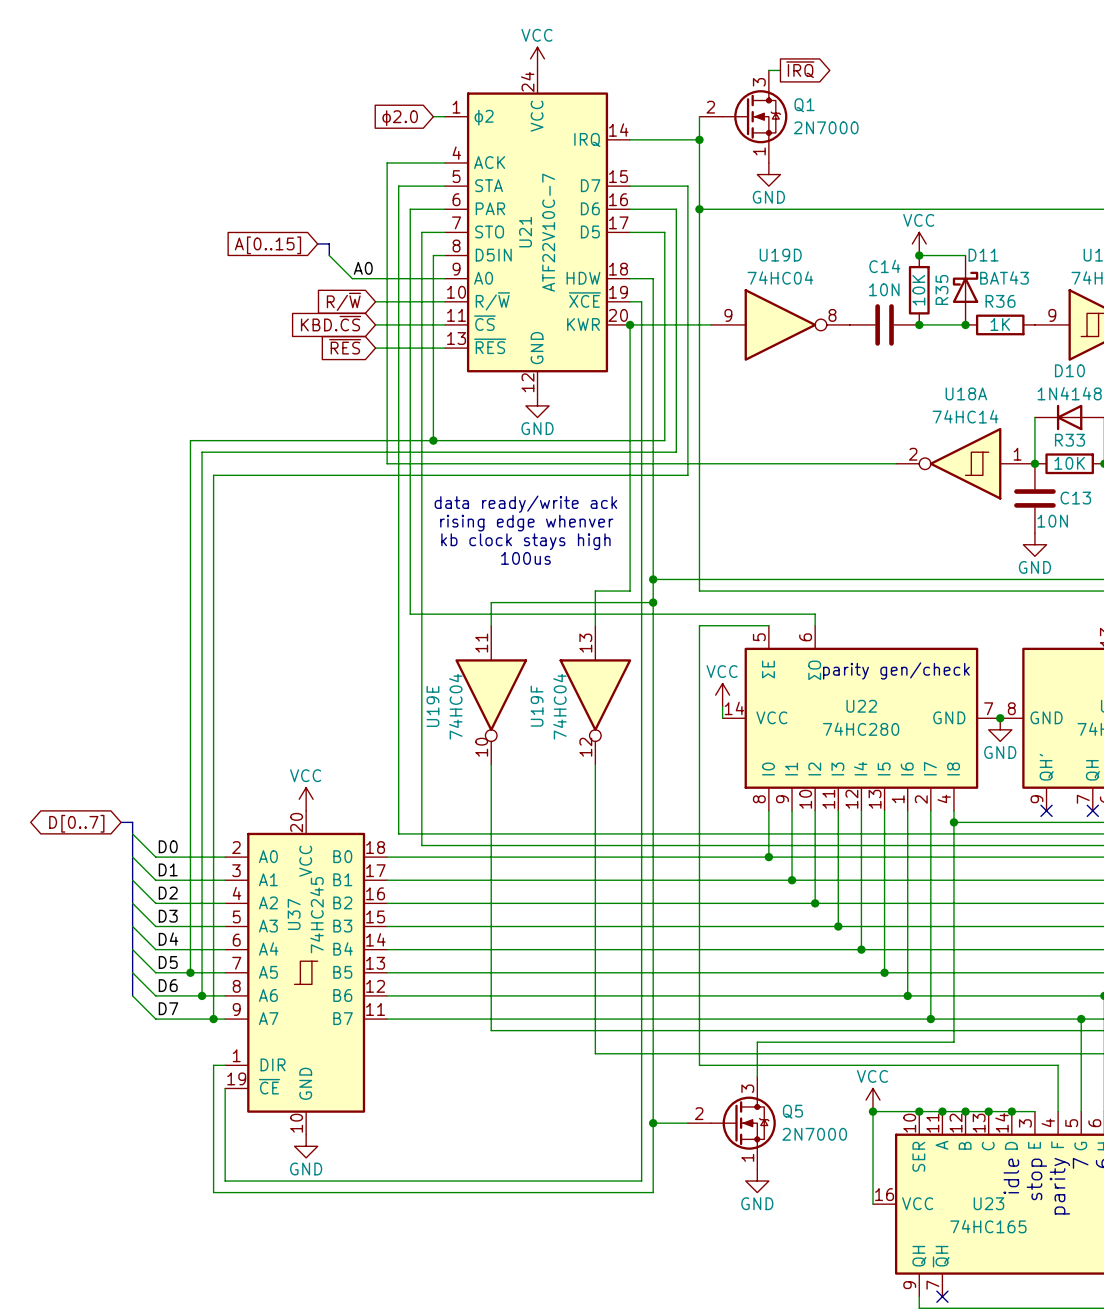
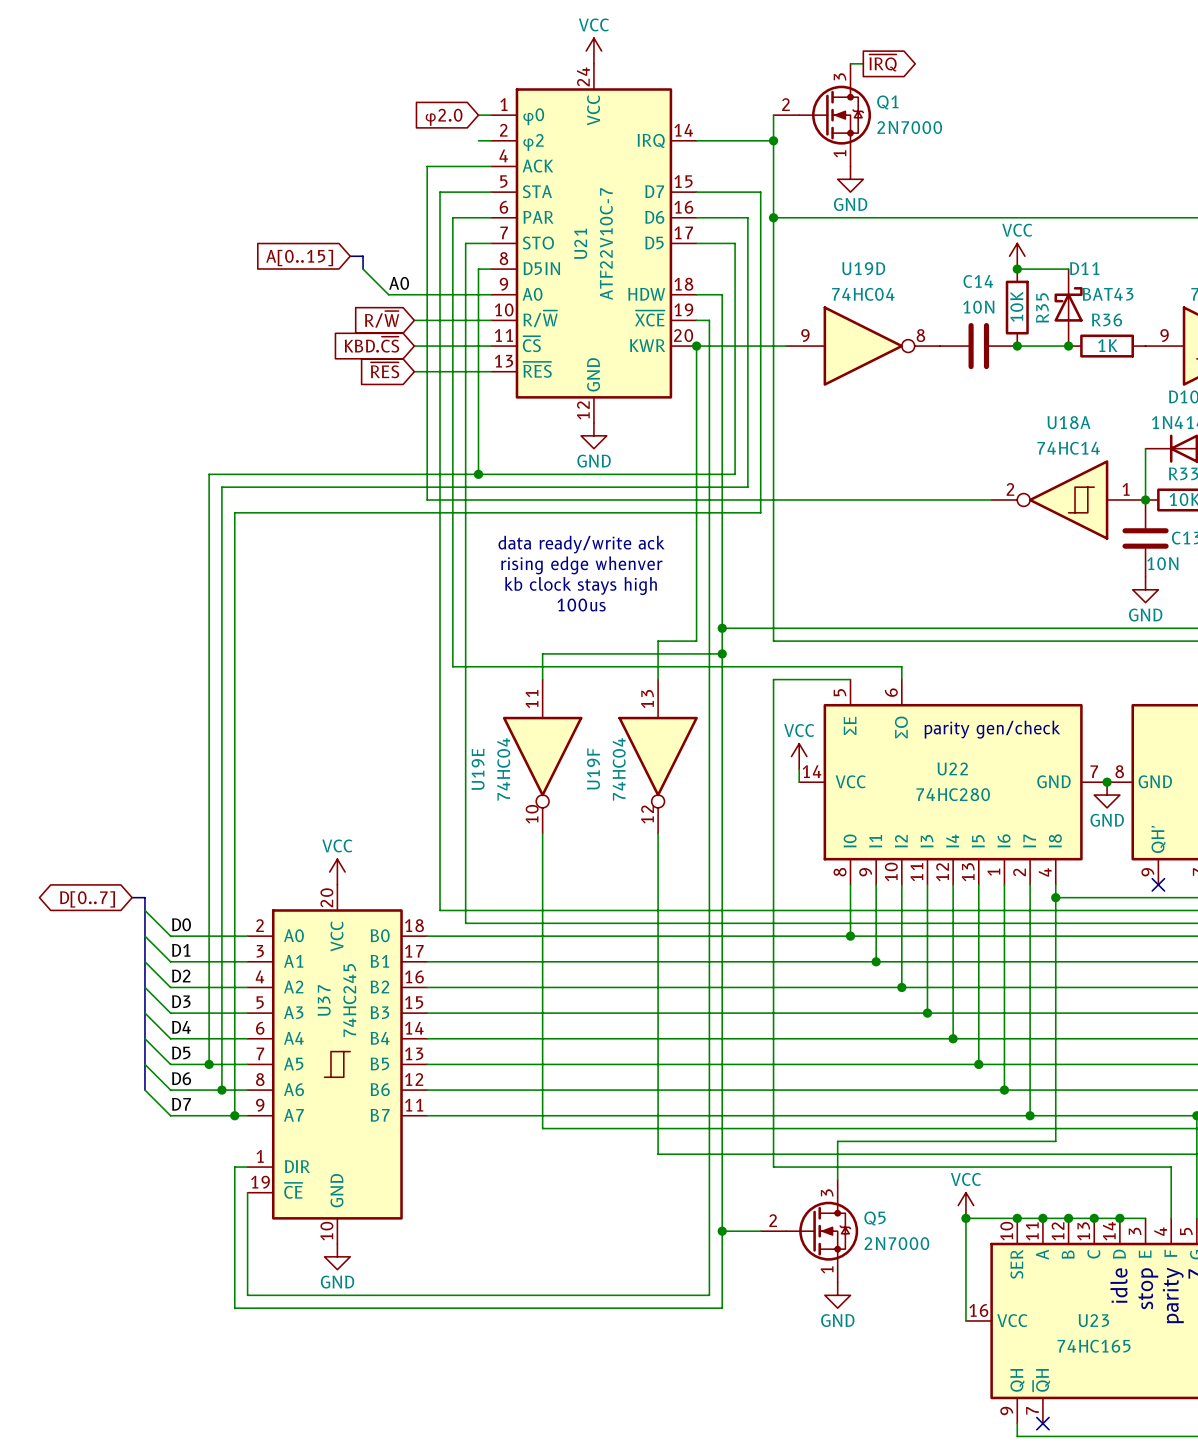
U21 symbol: [444, 70, 631, 395] -> [491, 63, 697, 424]
wire: none -> (478, 140) (491, 140)

